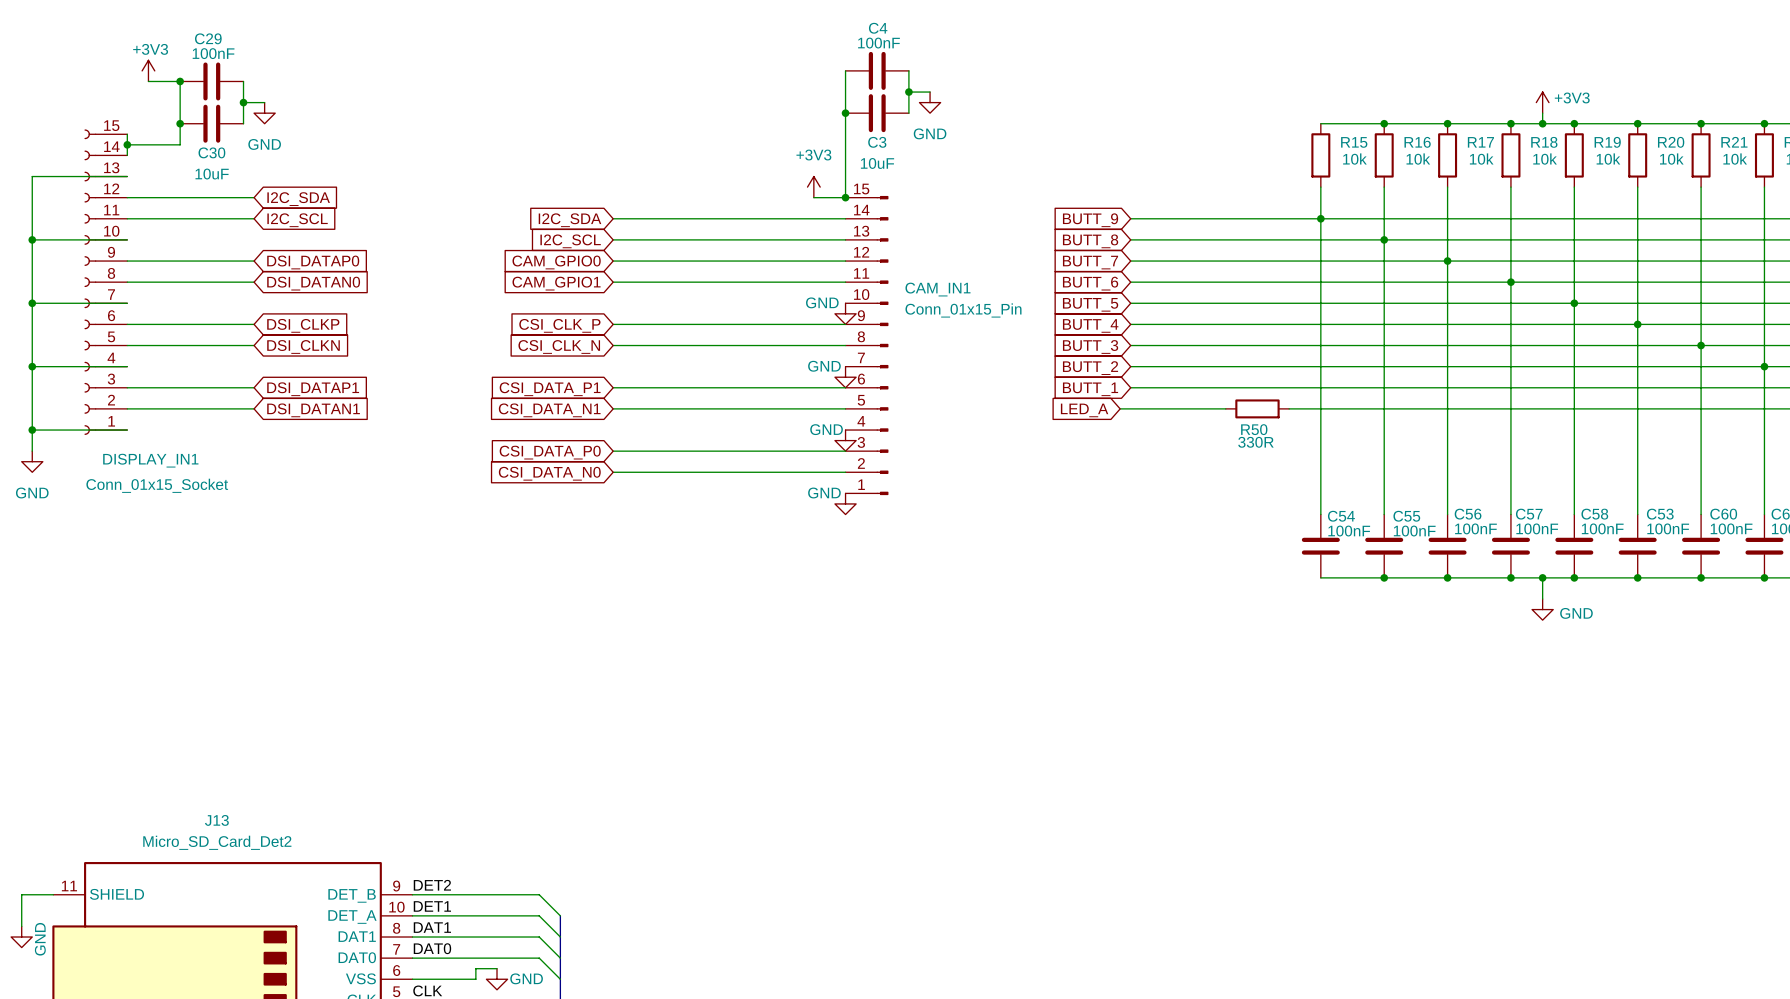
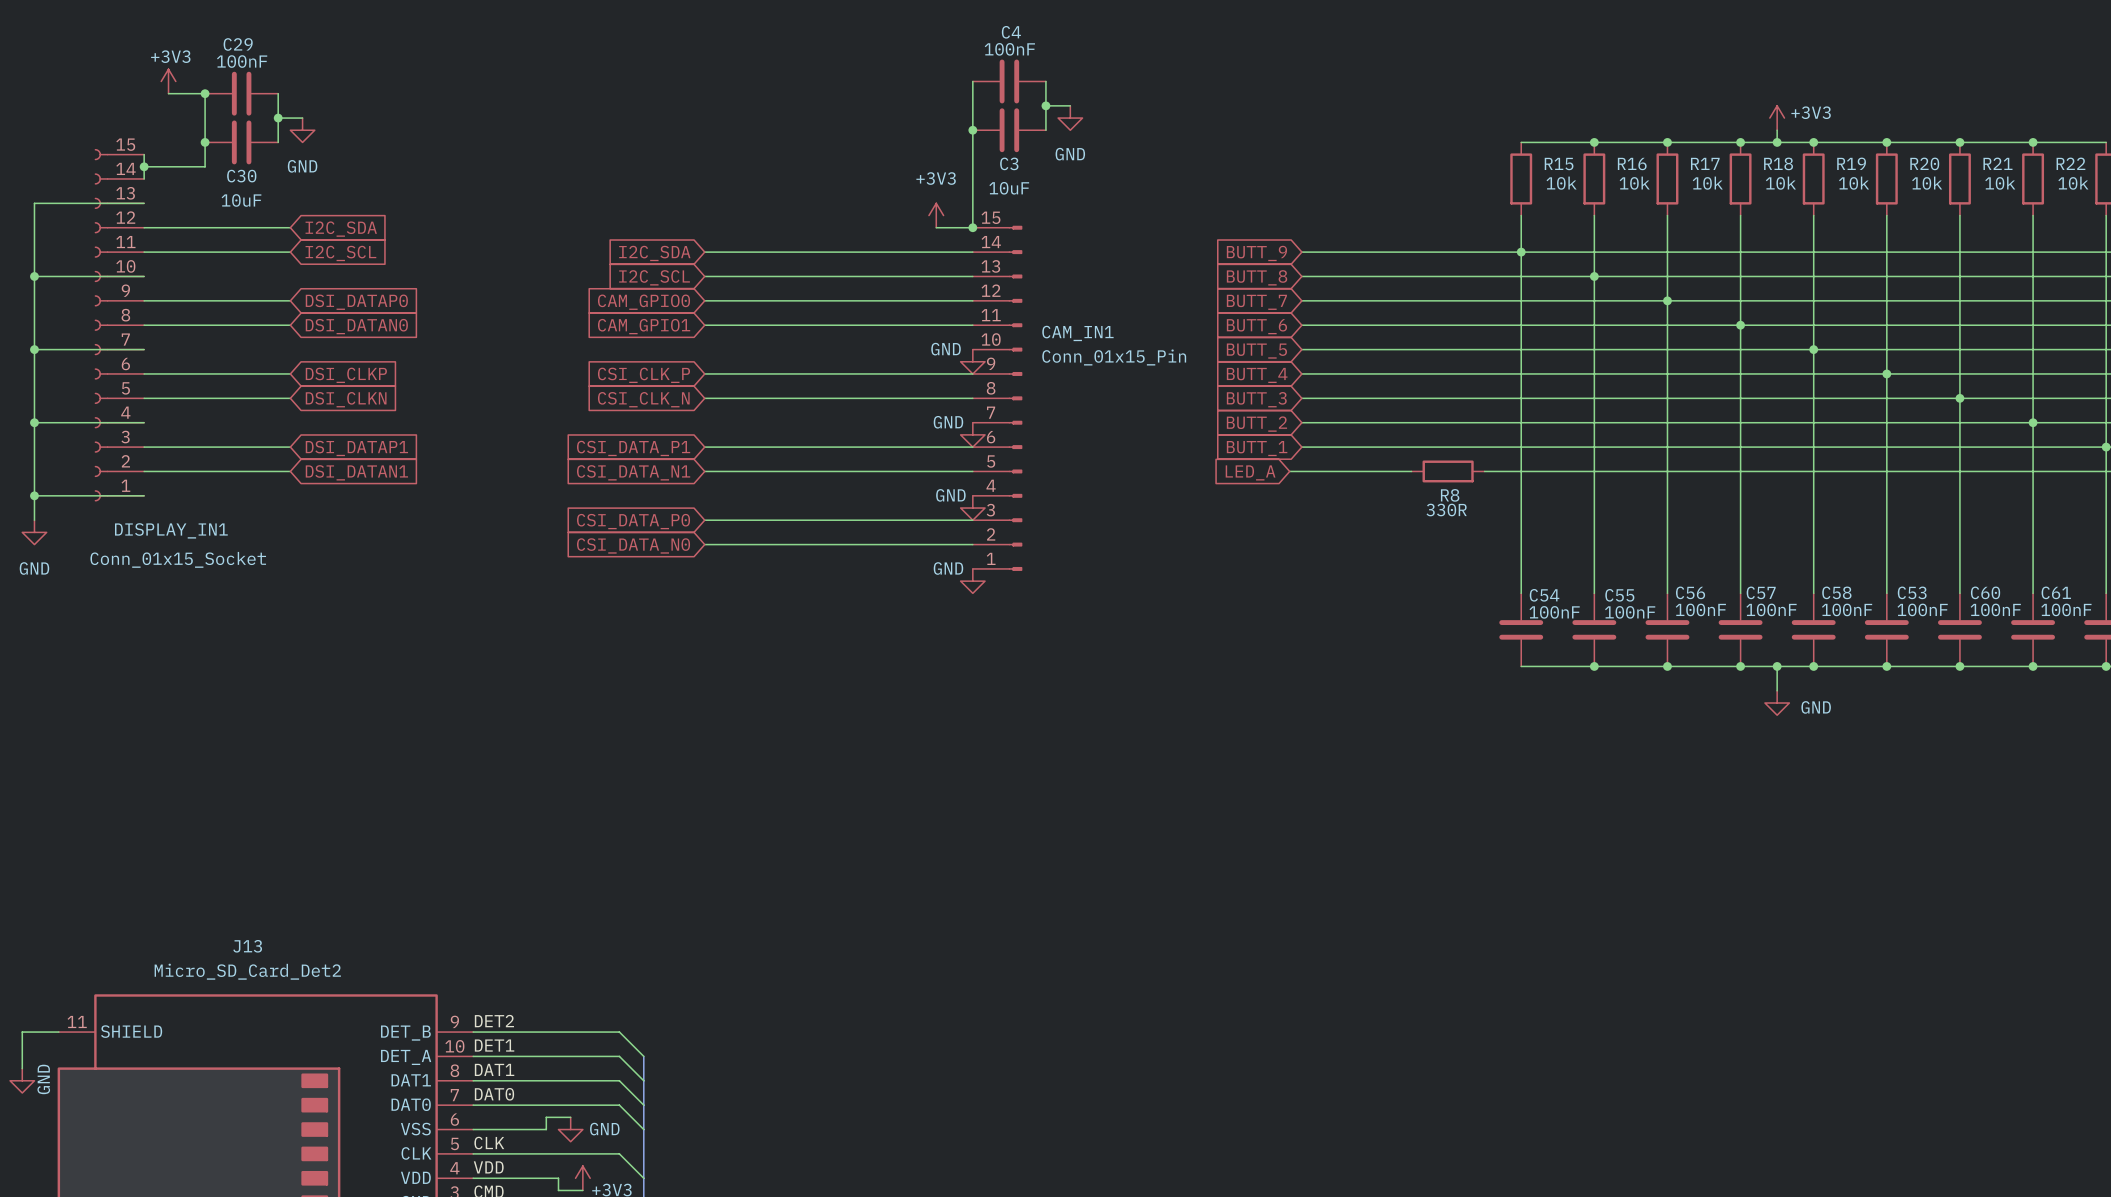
R50 name: R50 (1254, 429) -> R8 (1450, 495)

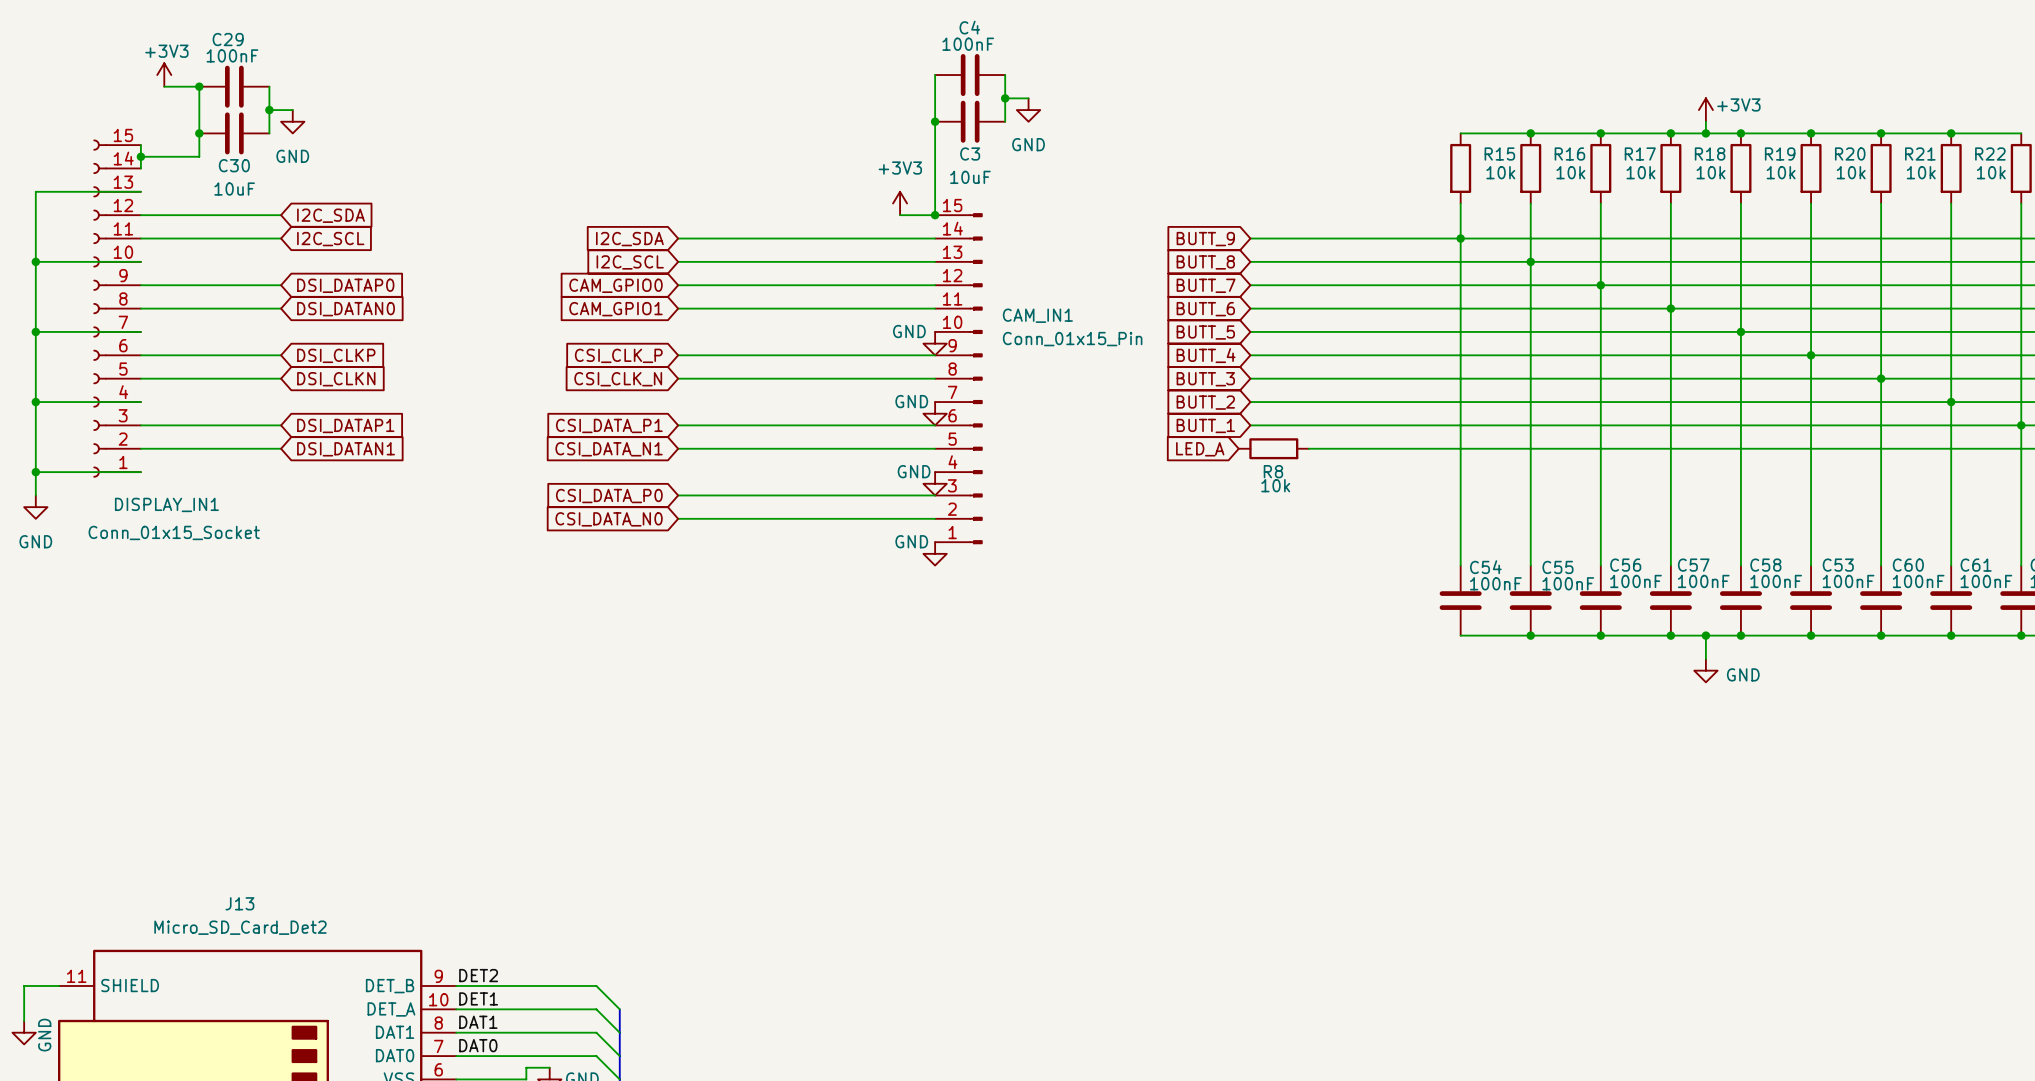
wire: (1289, 471) (1362, 471) -> (1355, 448) (1425, 448)
R8 position: (1448, 471) -> (1273, 448)
R8 value: 330R (1446, 510) -> 10k (1275, 485)

